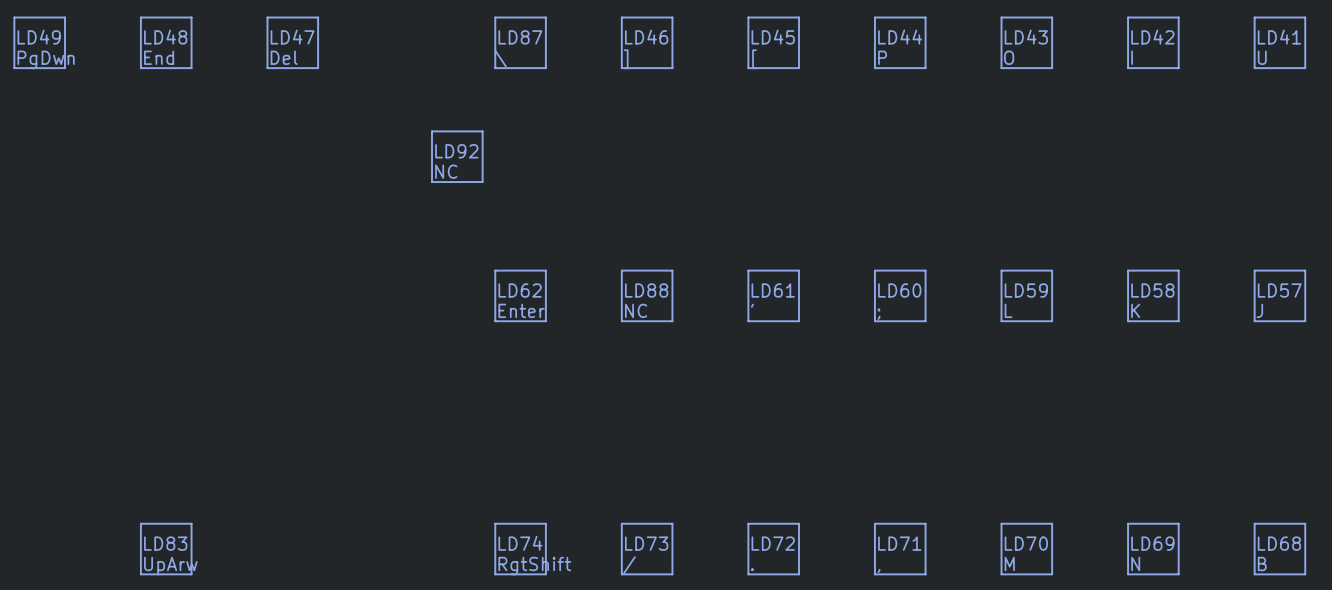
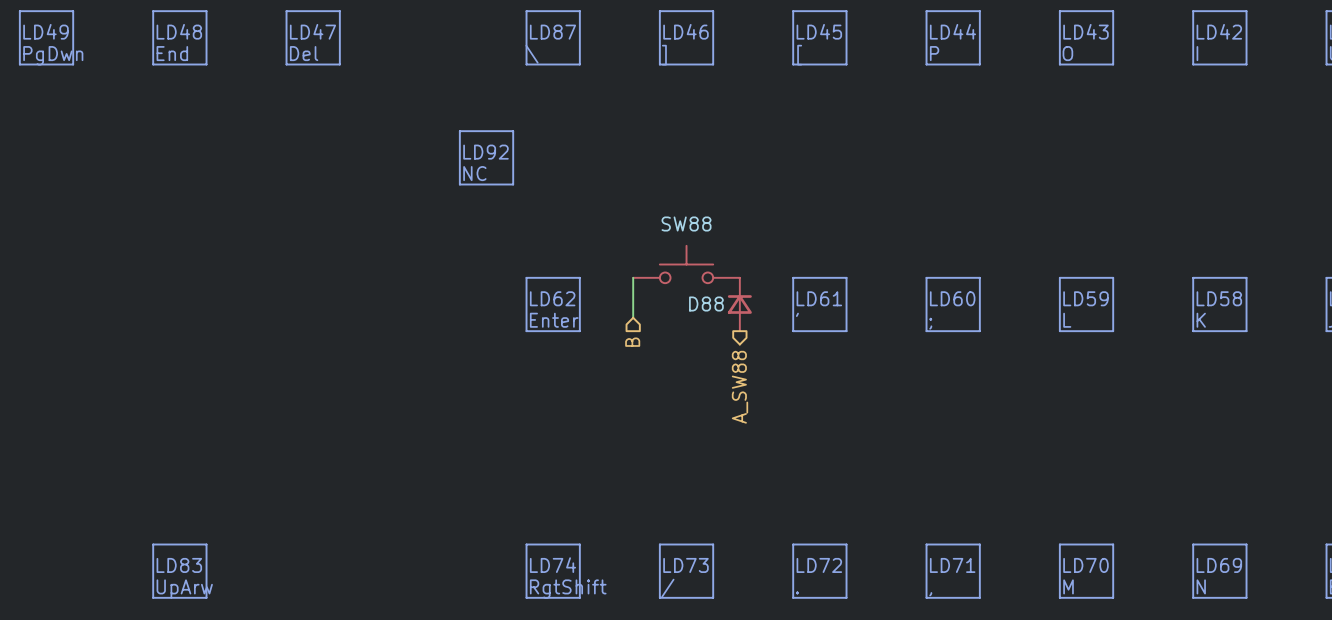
SW88: none -> (686, 264)
wire: none -> (633, 277) (633, 317)
line: (621, 270) (672, 270) (672, 321) (621, 321) (621, 270) -> none
text: LD88 (646, 290) -> none
D88: none -> (739, 304)
text: NC (636, 310) -> none
hierarchical label: none -> B (632, 342)
hierarchical label: none -> A_SW88 (739, 387)

